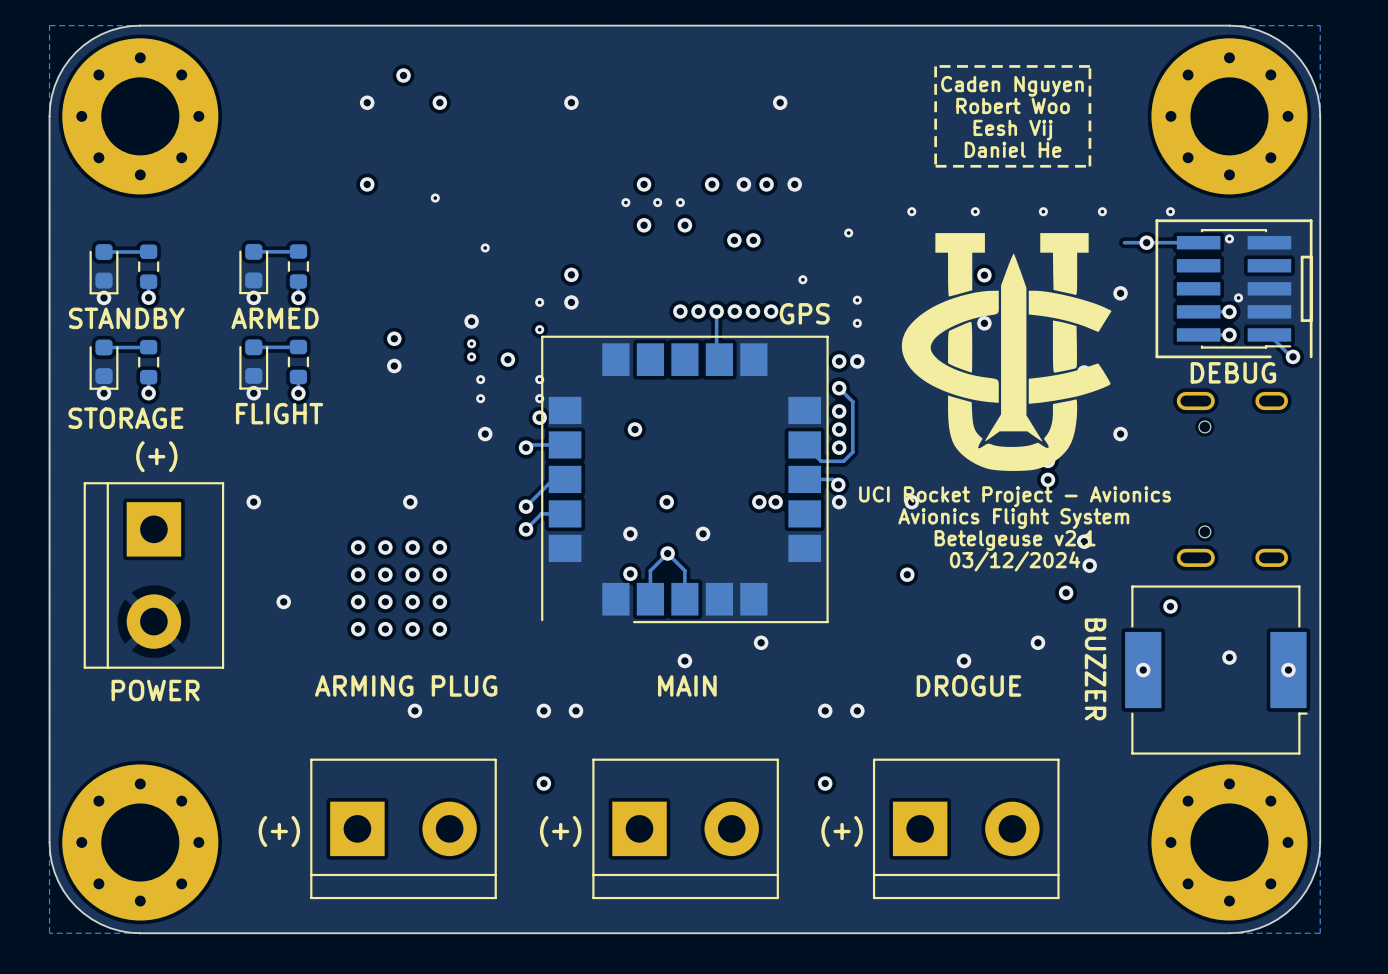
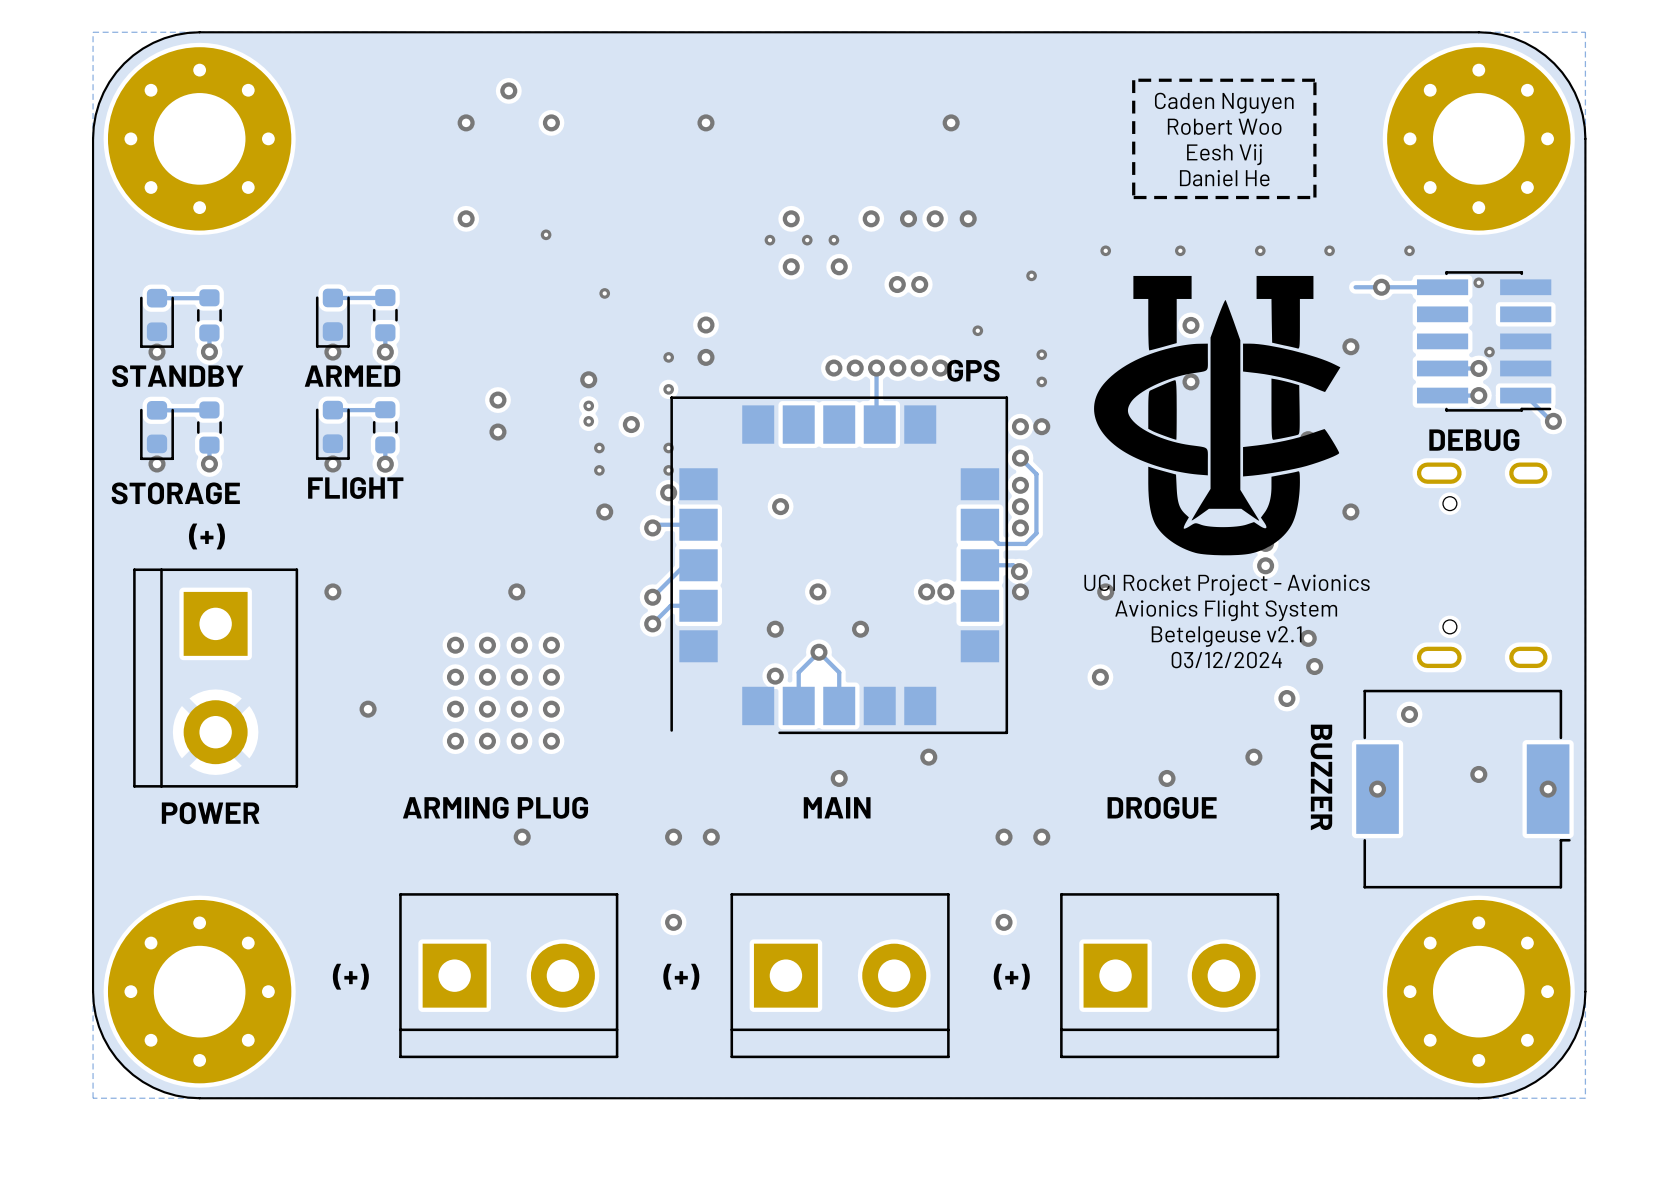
line: (1311, 257) (1302, 257) (1302, 320) (1311, 320) -> none
line: (1311, 356) (1311, 220) (1156, 220) (1156, 356) (1270, 356) -> none

